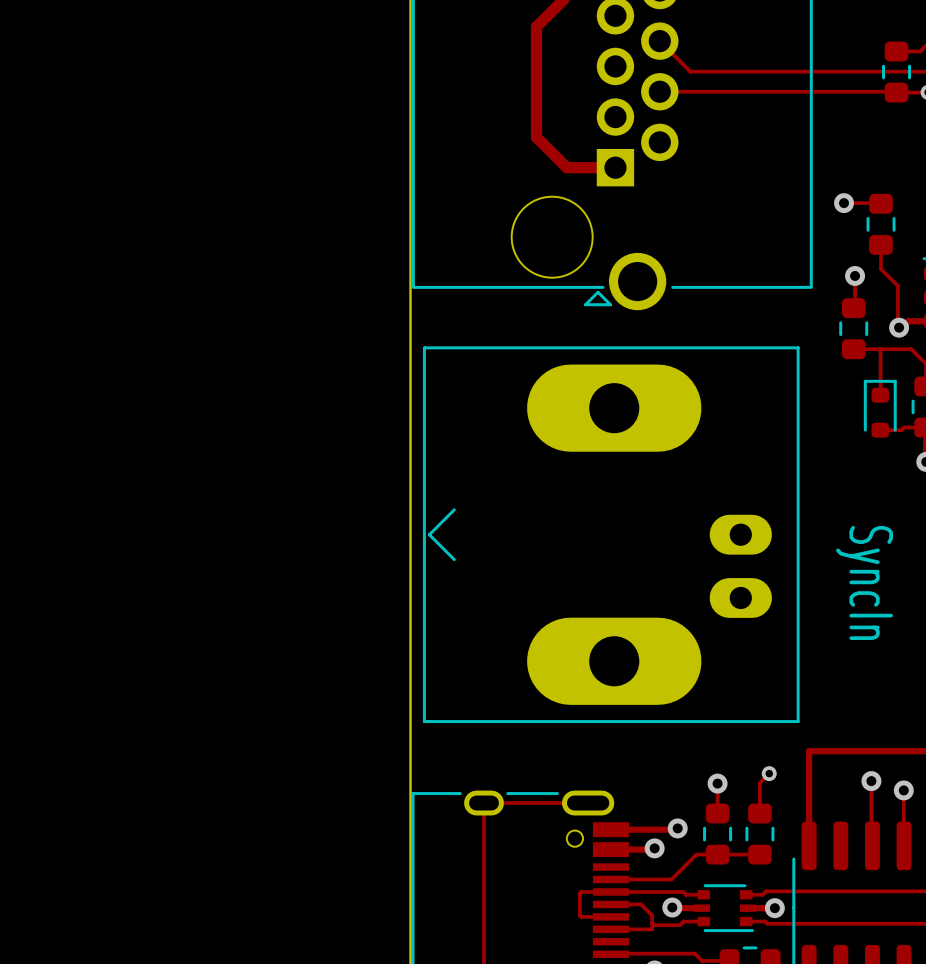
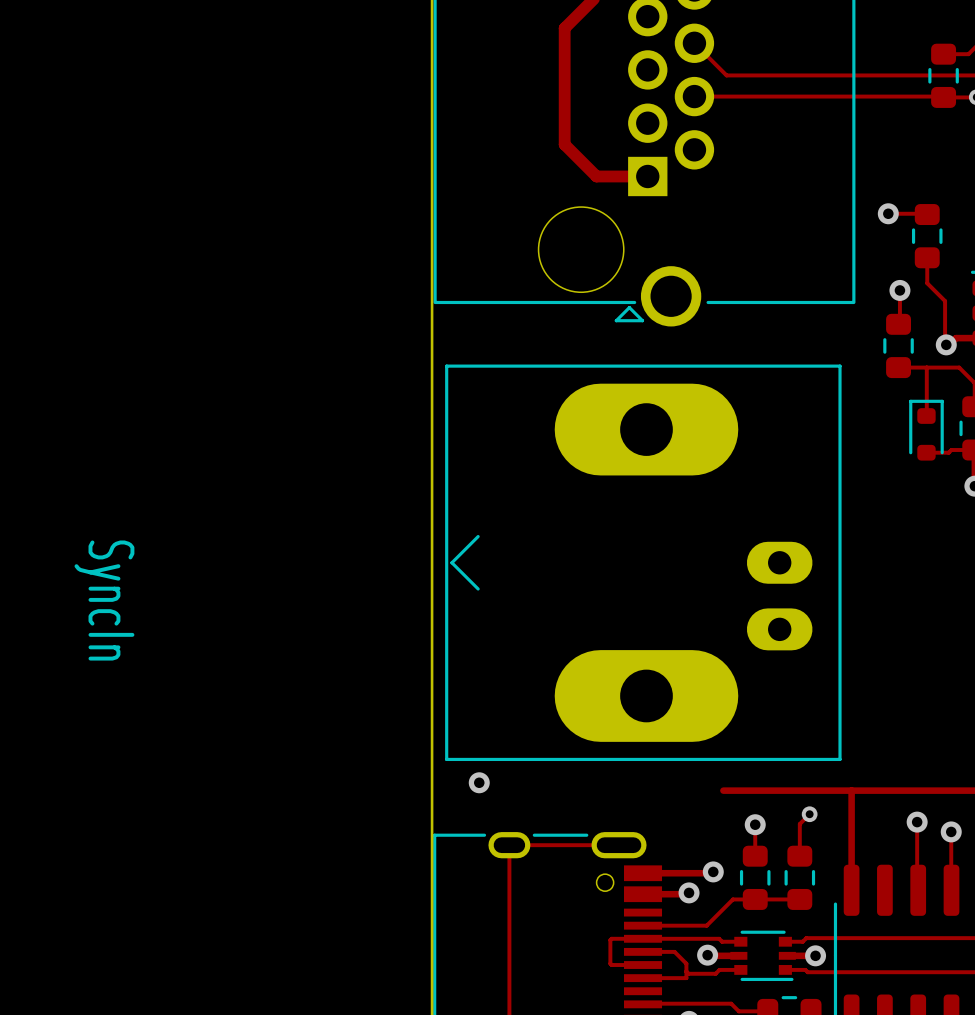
text: none -> SyncIn (104, 600)
text: SyncIn (864, 582) -> none
via: none -> (479, 782)
track: none -> (723, 790) (851, 790)

